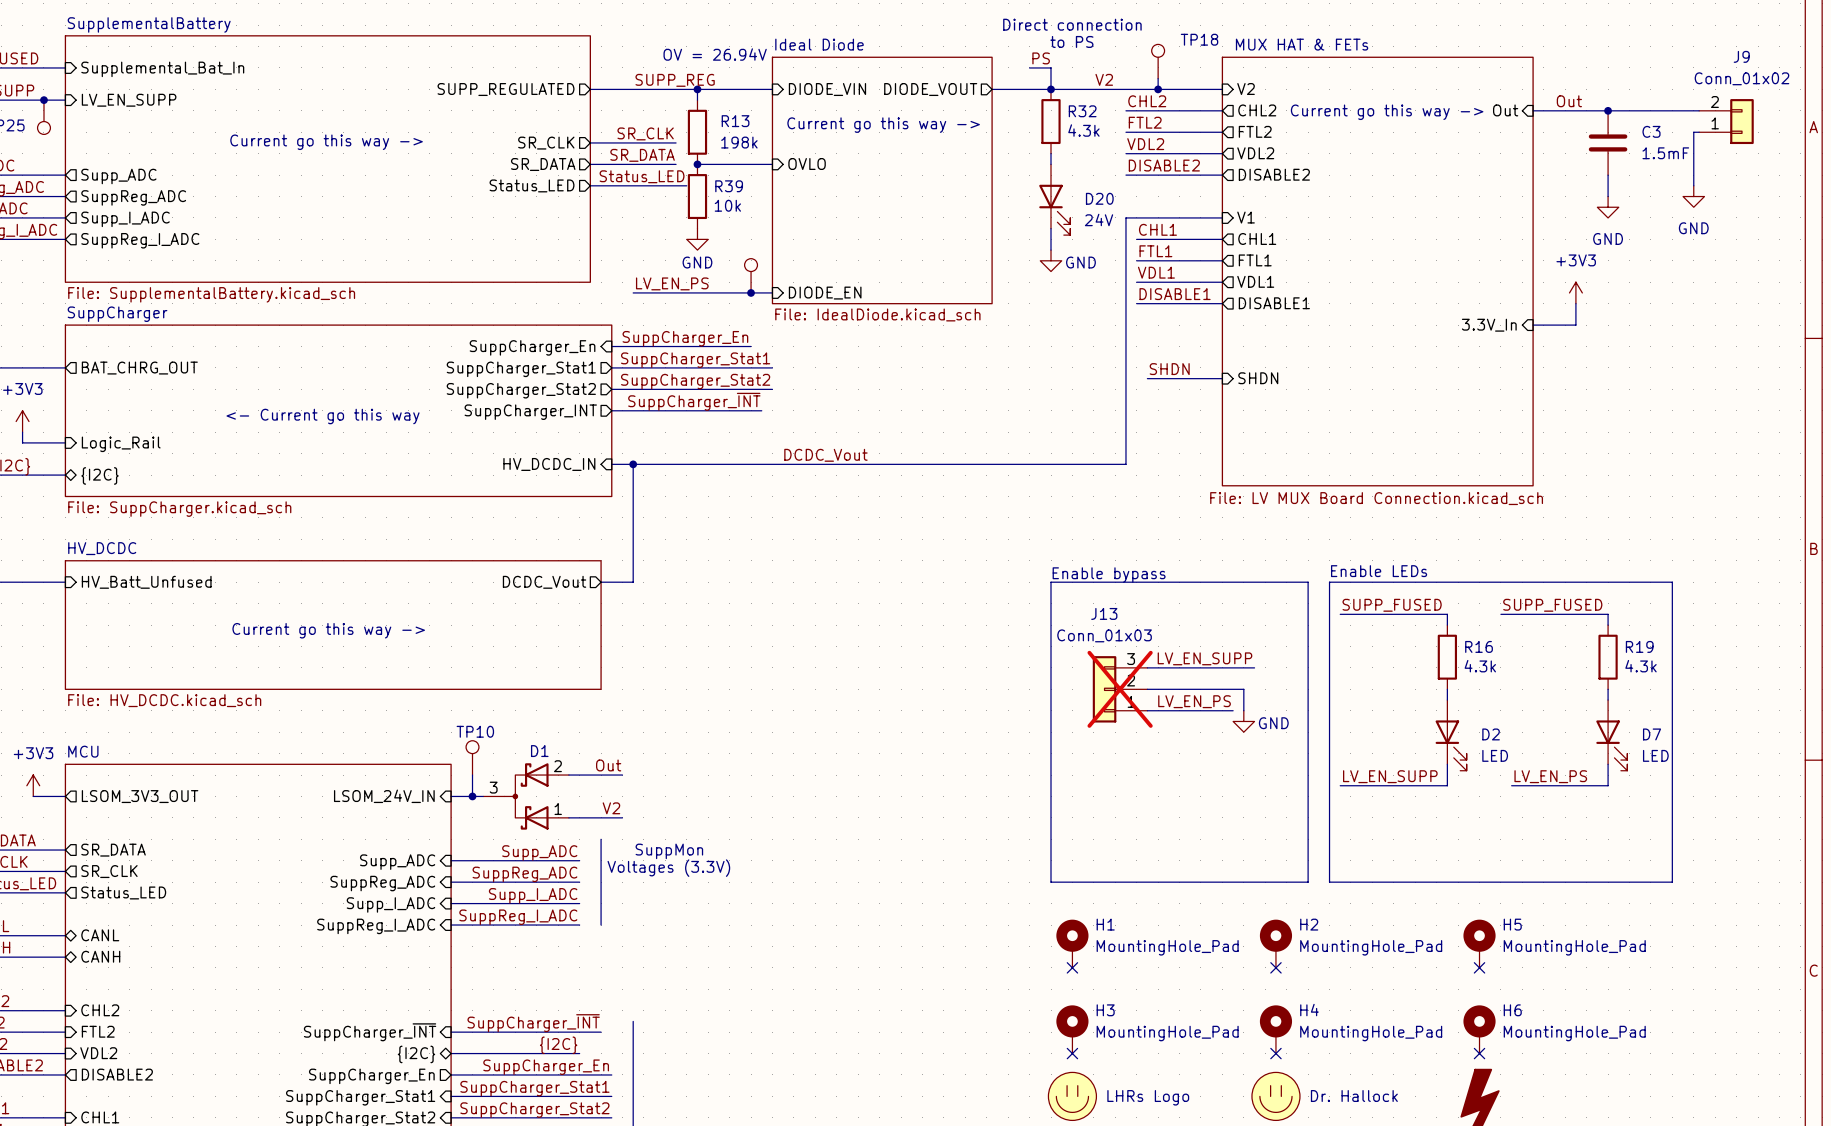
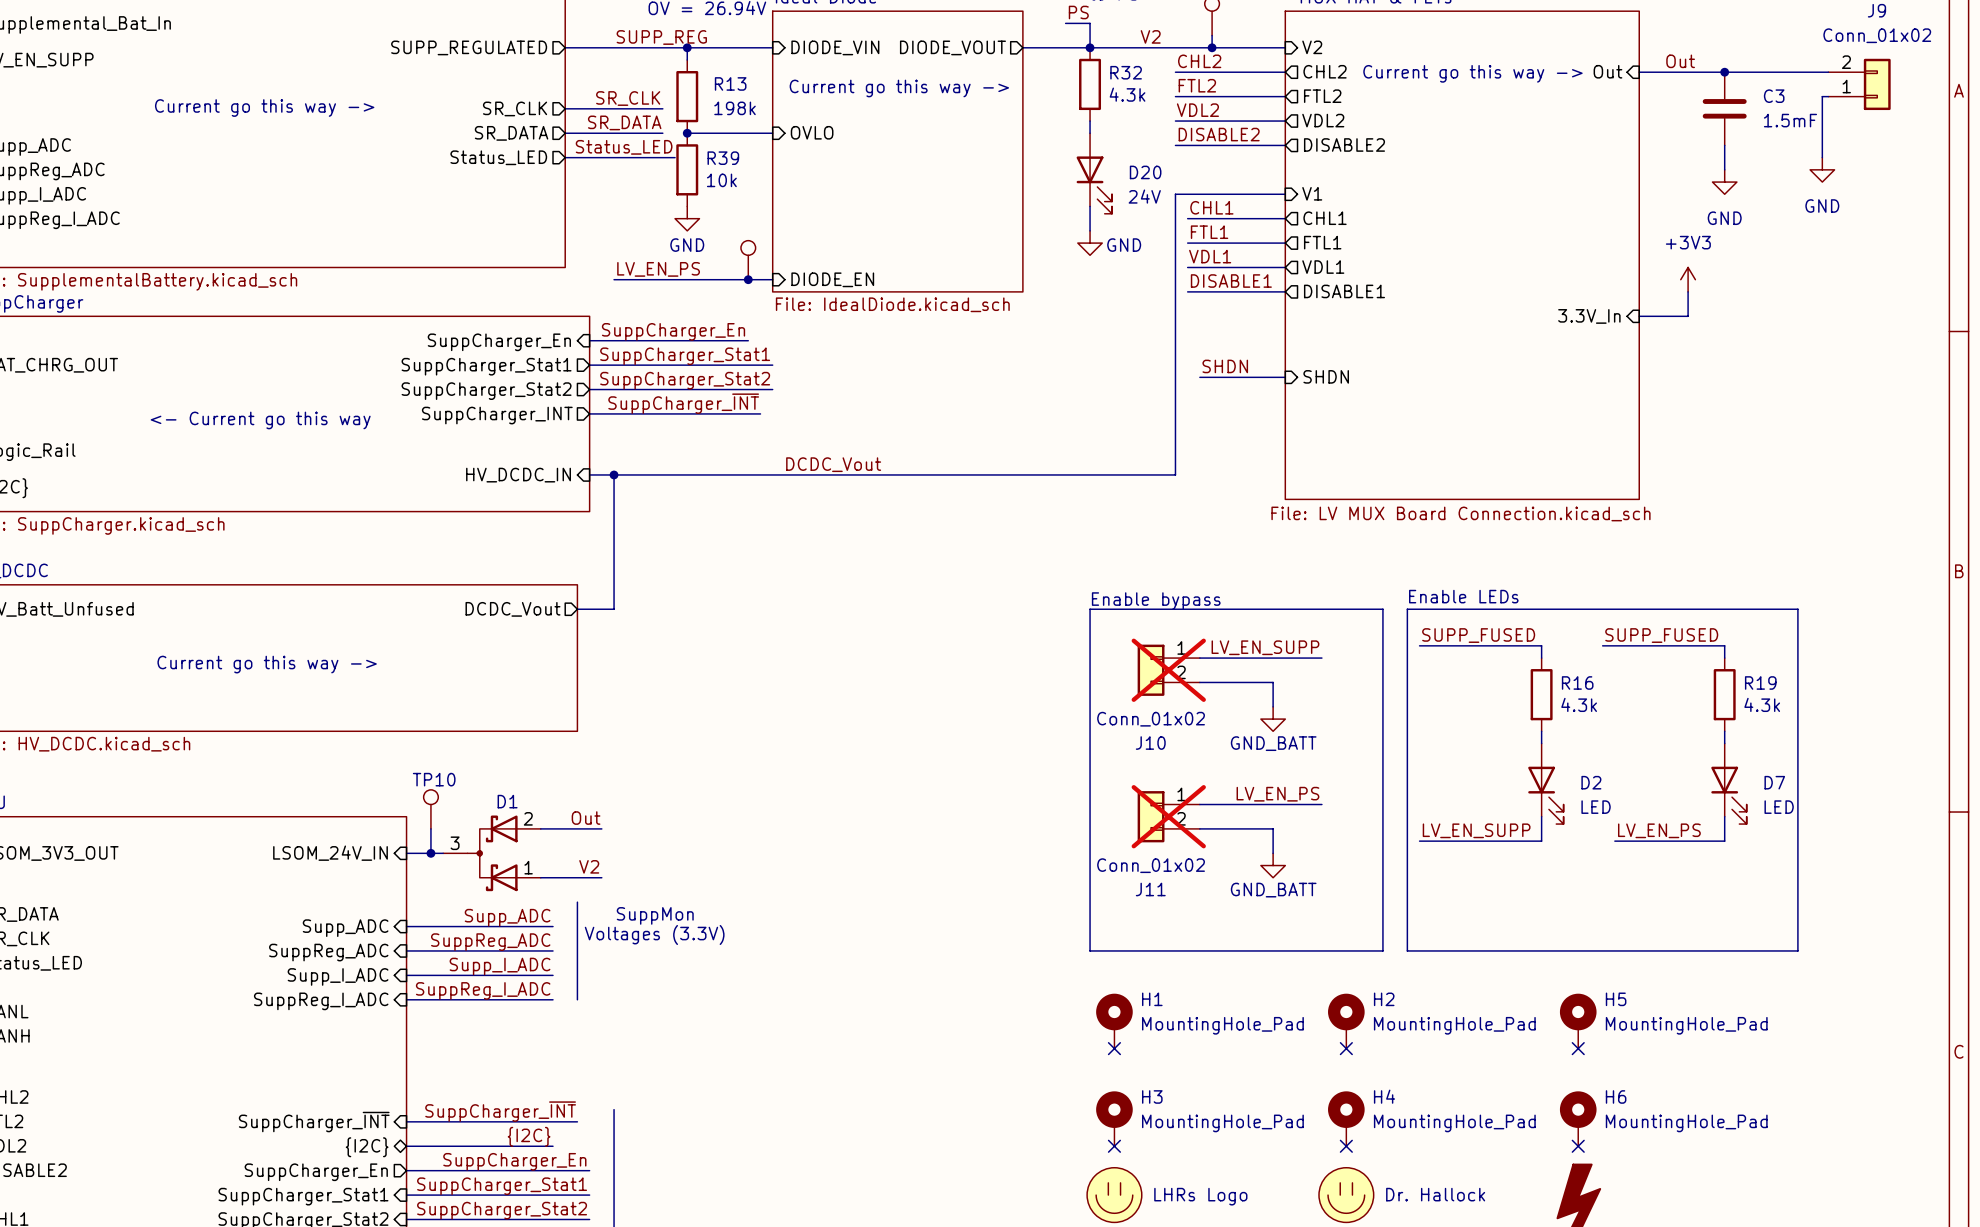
J10: none -> Conn_01x02 (1168, 670)
wire: none -> (1199, 682) (1273, 682) (1273, 706)
label position: LV_EN_SUPP (1204, 658) -> LV_EN_SUPP (1265, 647)
wire: (1147, 667) (1254, 667) -> (1199, 658) (1321, 658)
power symbol: none -> GND_BATT (1273, 719)
J13: Conn_01x03 (1120, 689) -> none
wire: (1147, 689) (1243, 689) (1243, 710) -> none
label position: LV_EN_PS (1194, 701) -> LV_EN_PS (1277, 794)
wire: (1147, 710) (1233, 710) -> none
power symbol: GND (1243, 721) -> none
wire: none -> (1199, 804) (1321, 804)
J11: none -> Conn_01x02 (1168, 816)
wire: none -> (1199, 828) (1273, 828) (1273, 853)
power symbol: none -> GND_BATT (1273, 865)

